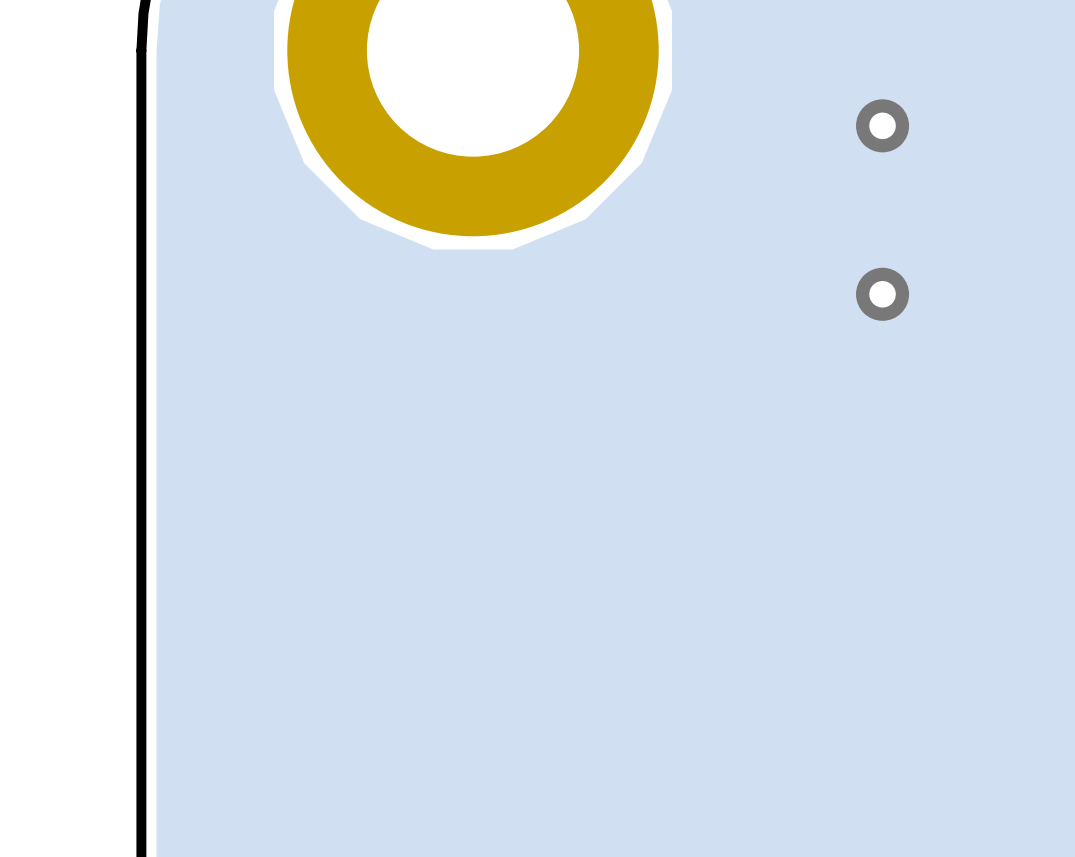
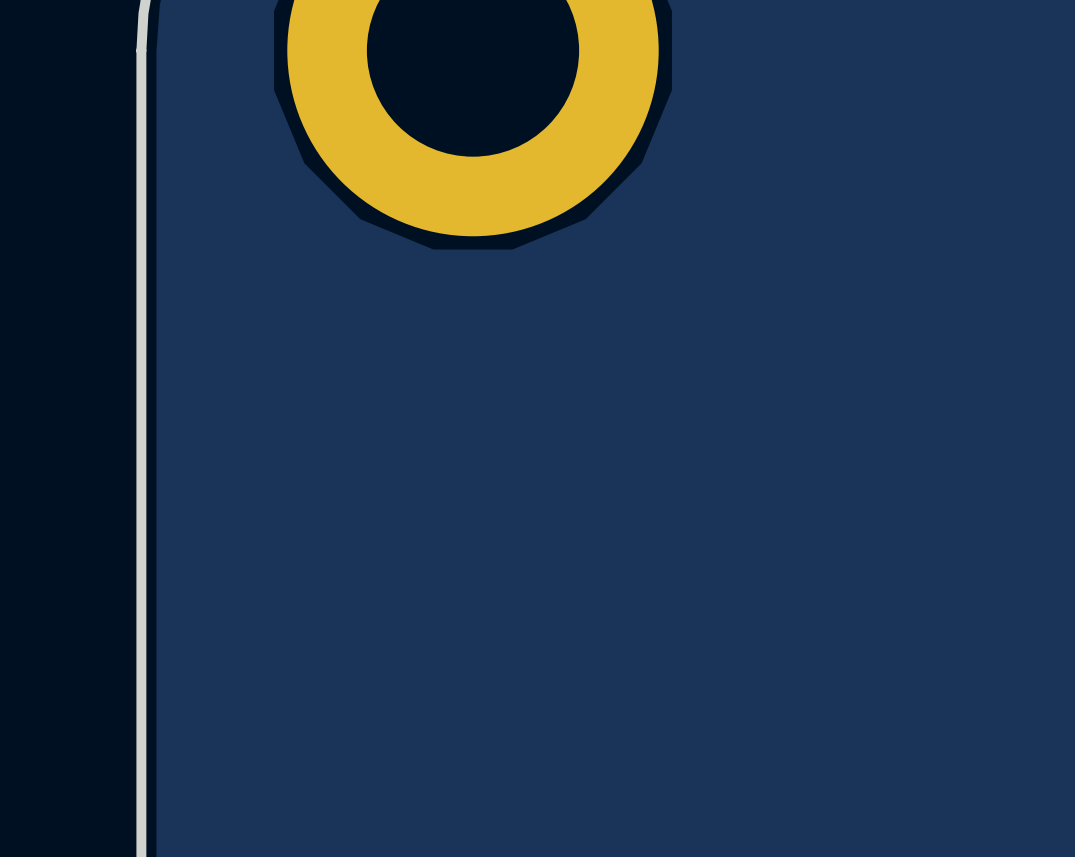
via: (882, 125) -> none
via: (882, 294) -> none

